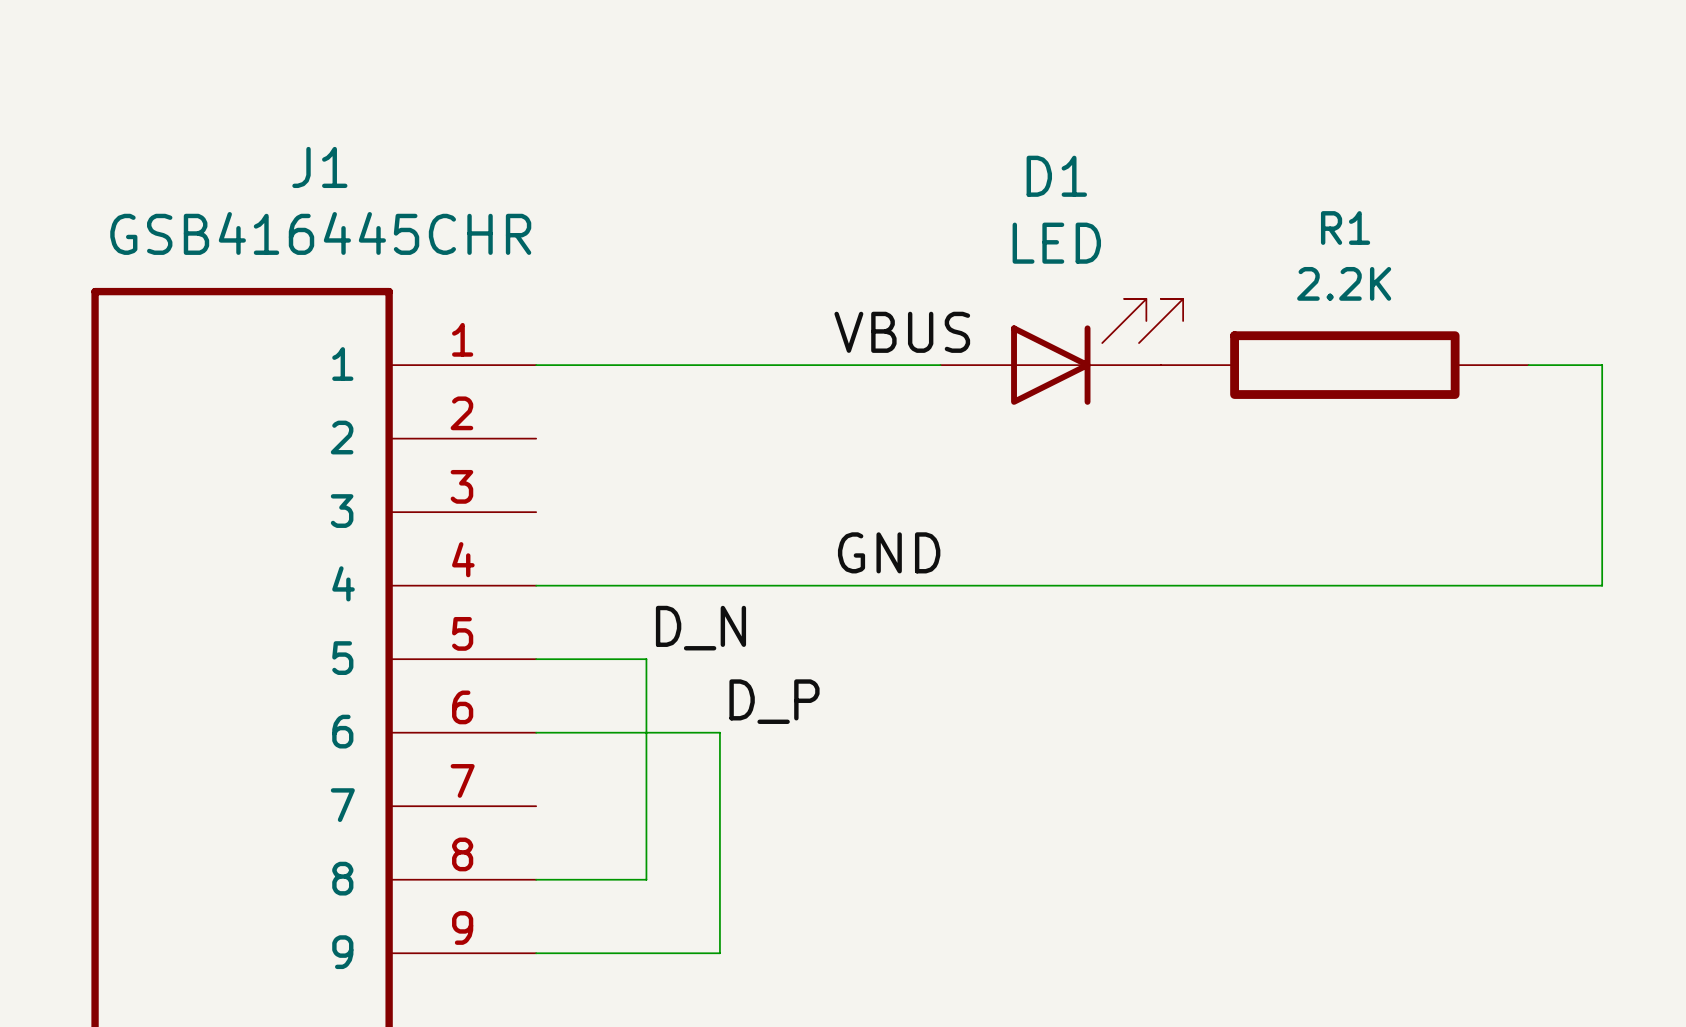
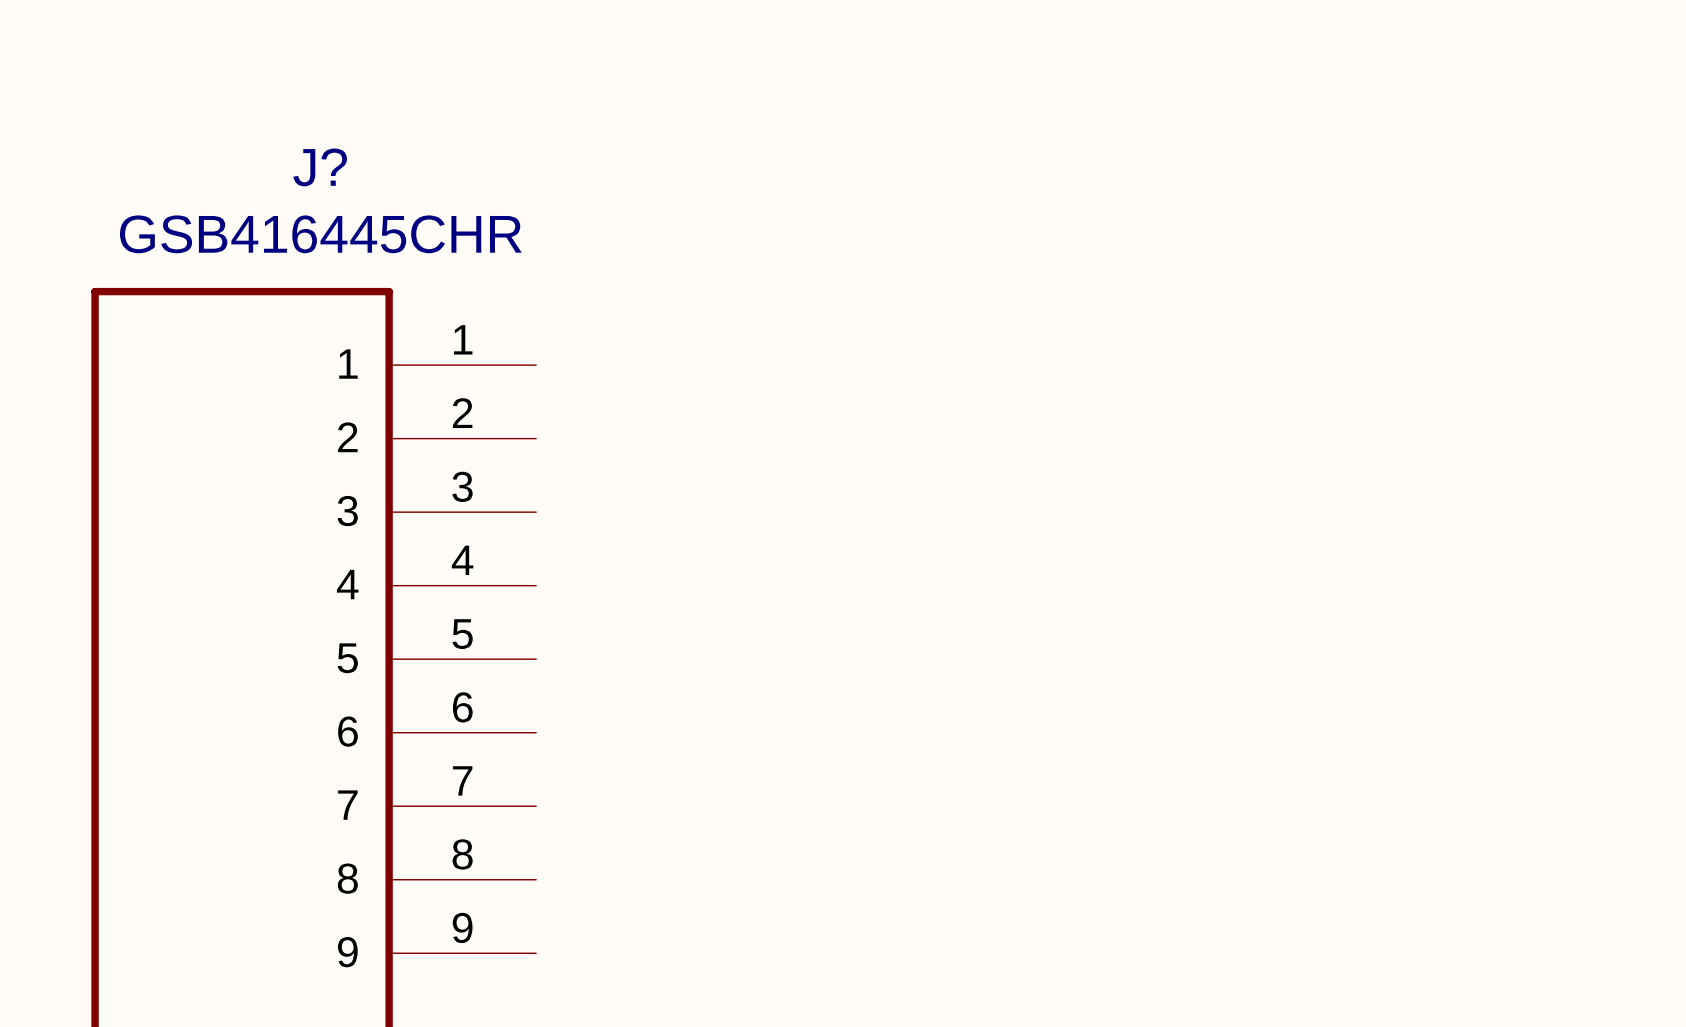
J1 name: J1 (319, 167) -> J? (320, 167)
label: VBUS (902, 332) -> none
D1: LED (1061, 351) -> none
wire: (536, 365) (940, 365) -> none
R1: 2.2K (1344, 365) -> none
wire: (1528, 365) (1602, 365) (1602, 585) (536, 585) -> none
label: GND (889, 552) -> none
label: D_N (700, 628) -> none
wire: (536, 659) (646, 659) (646, 879) (536, 879) -> none
label: D_P (774, 701) -> none
wire: (536, 732) (719, 732) (719, 953) (536, 953) -> none

